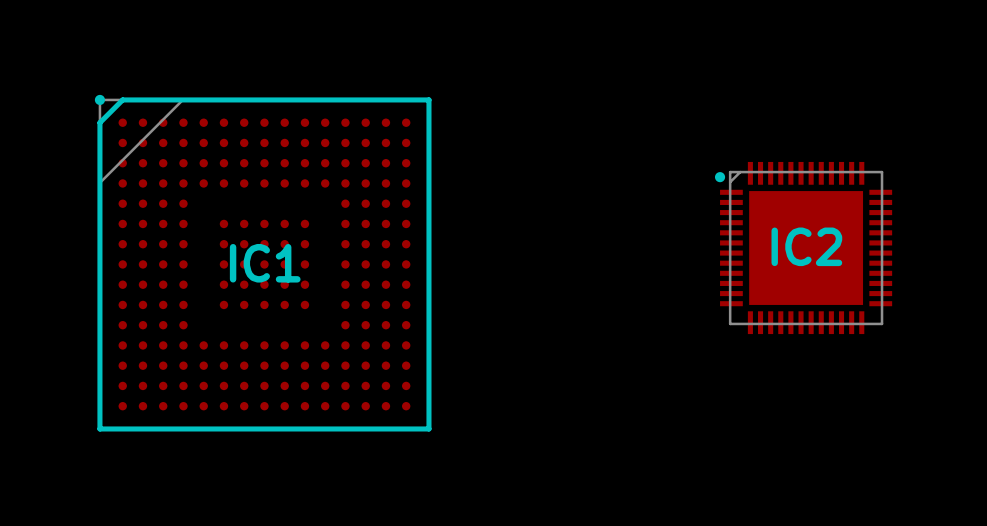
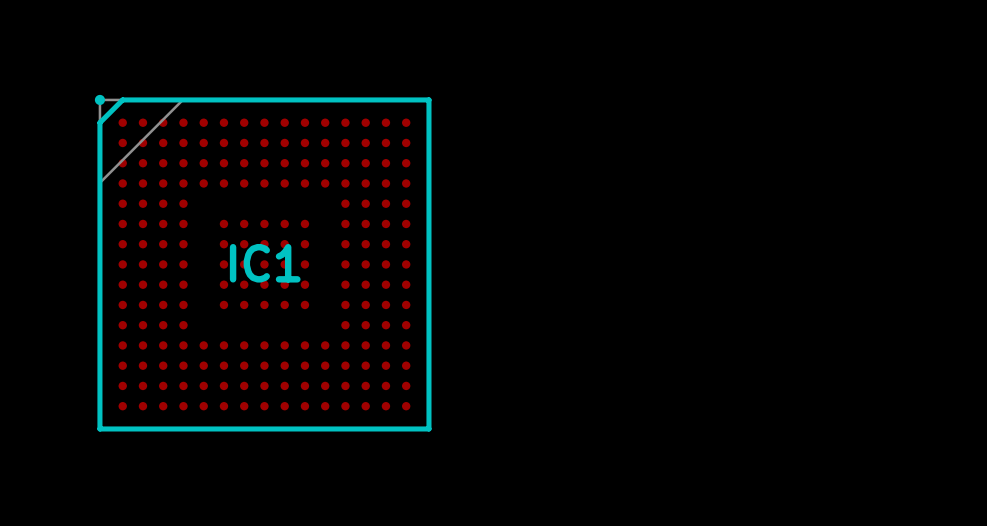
IC2: (803, 248) -> none

